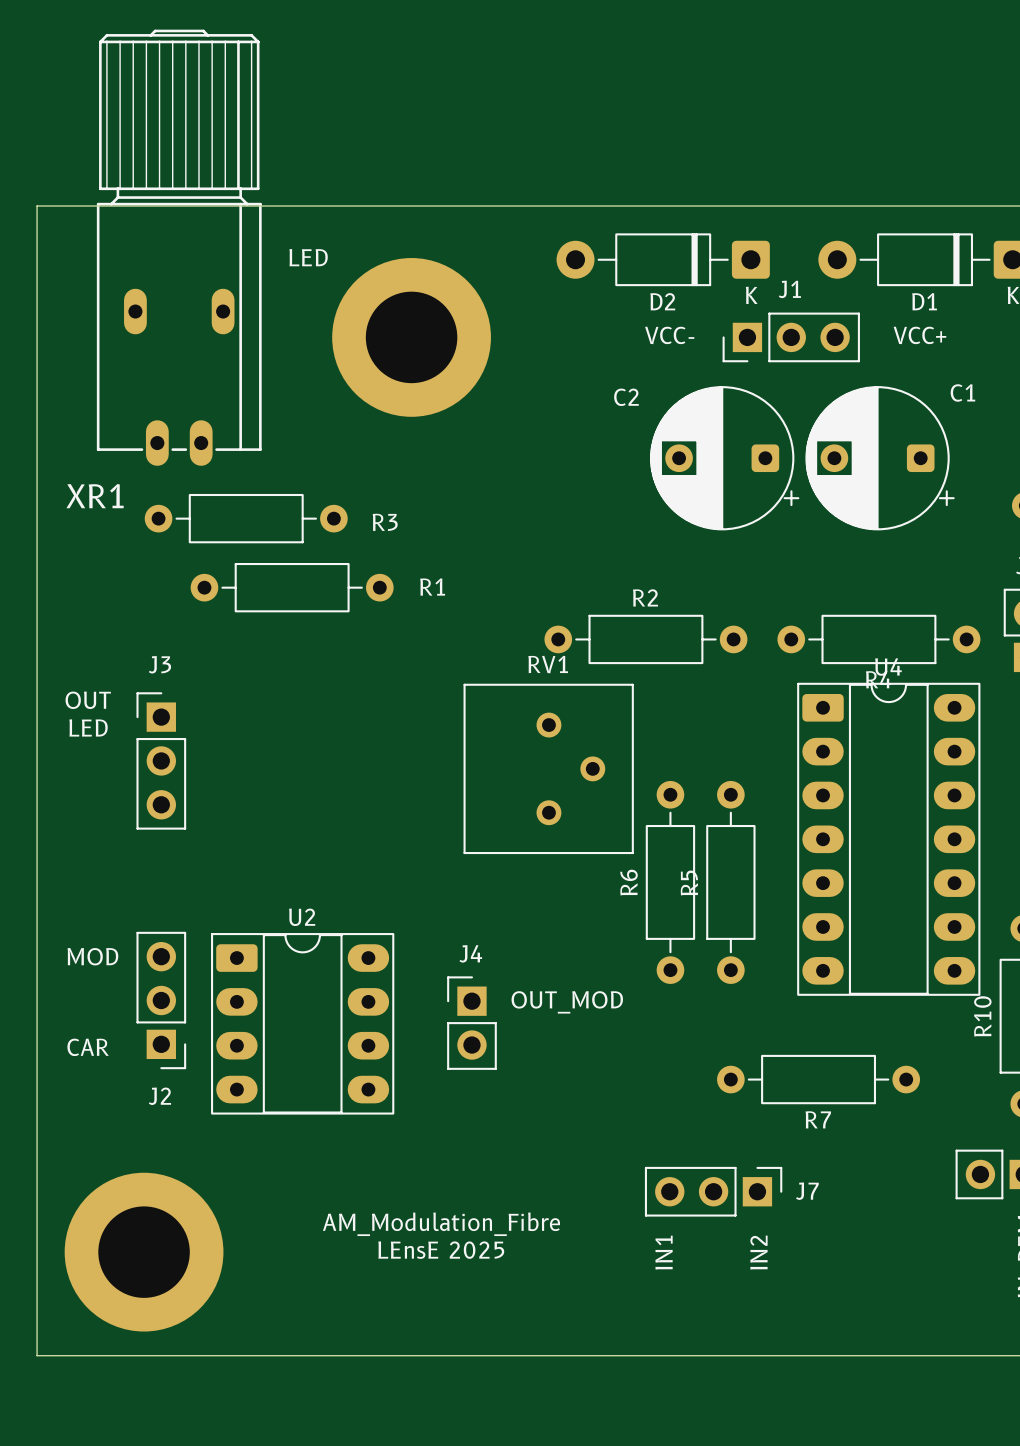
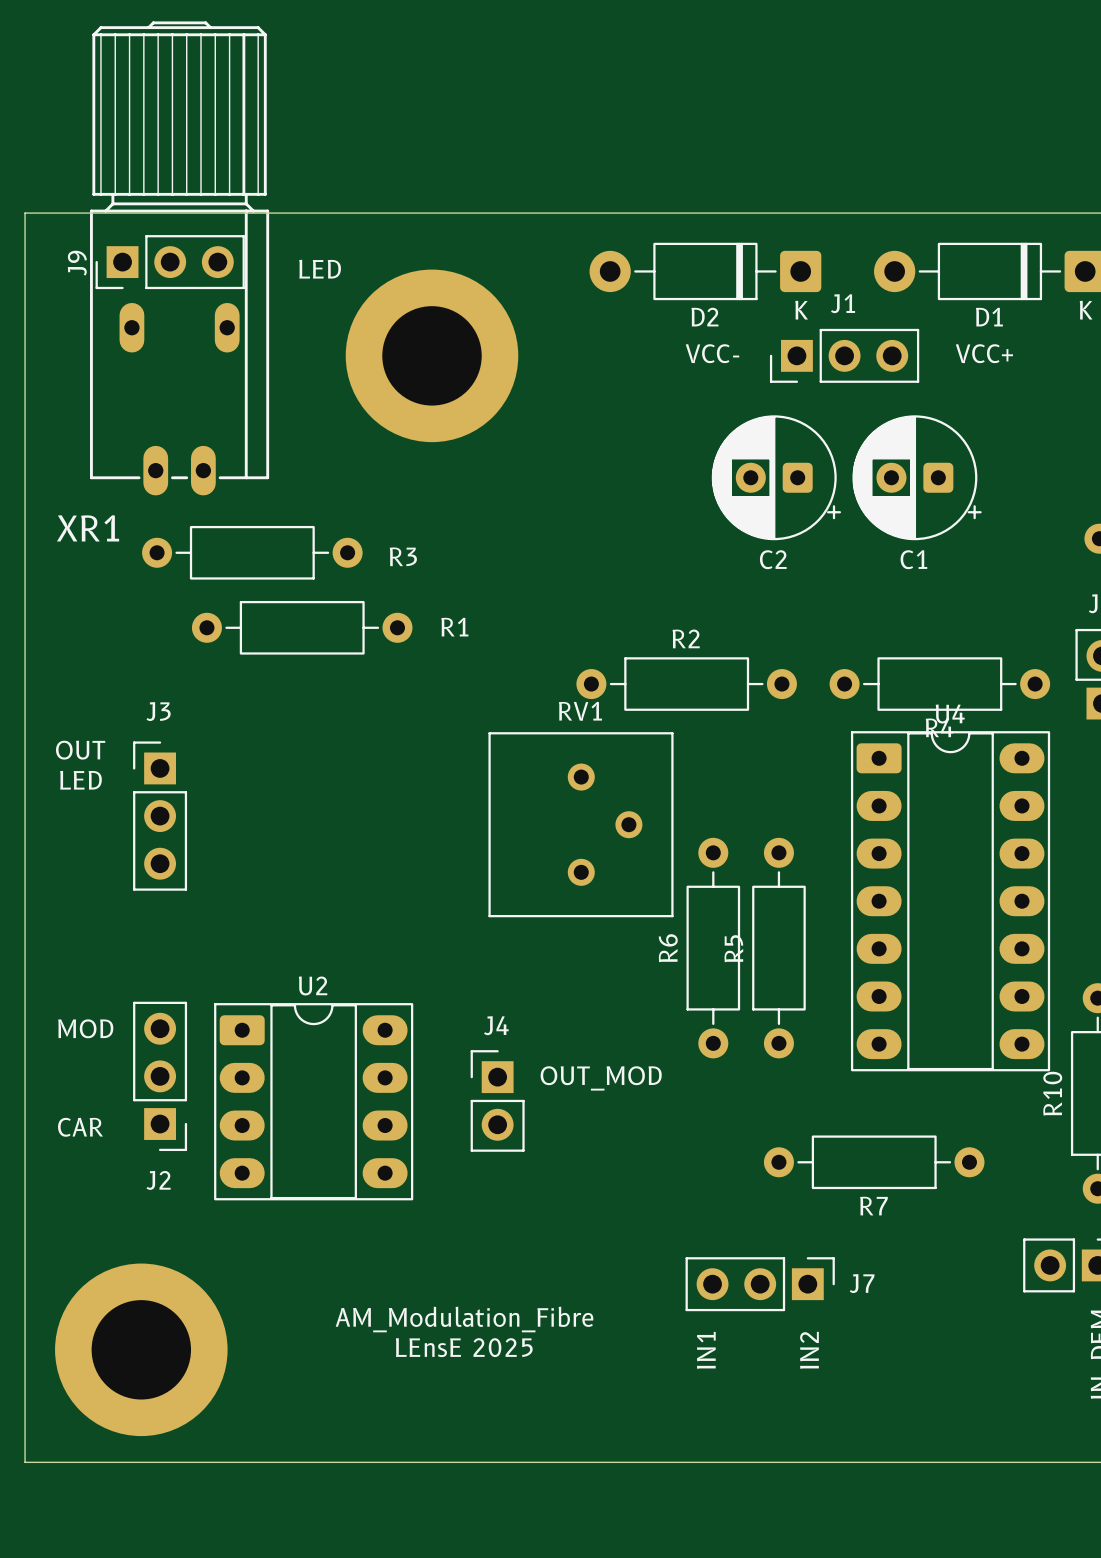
J9: none -> (170, 262)
C2 footprint: [650, 386, 800, 531] -> [711, 415, 842, 541]
C1 footprint: [805, 386, 955, 531] -> [852, 415, 982, 541]
C1 name position: C1 (962, 392) -> C1 (913, 559)
C2 name position: C2 (626, 397) -> C2 (773, 559)

